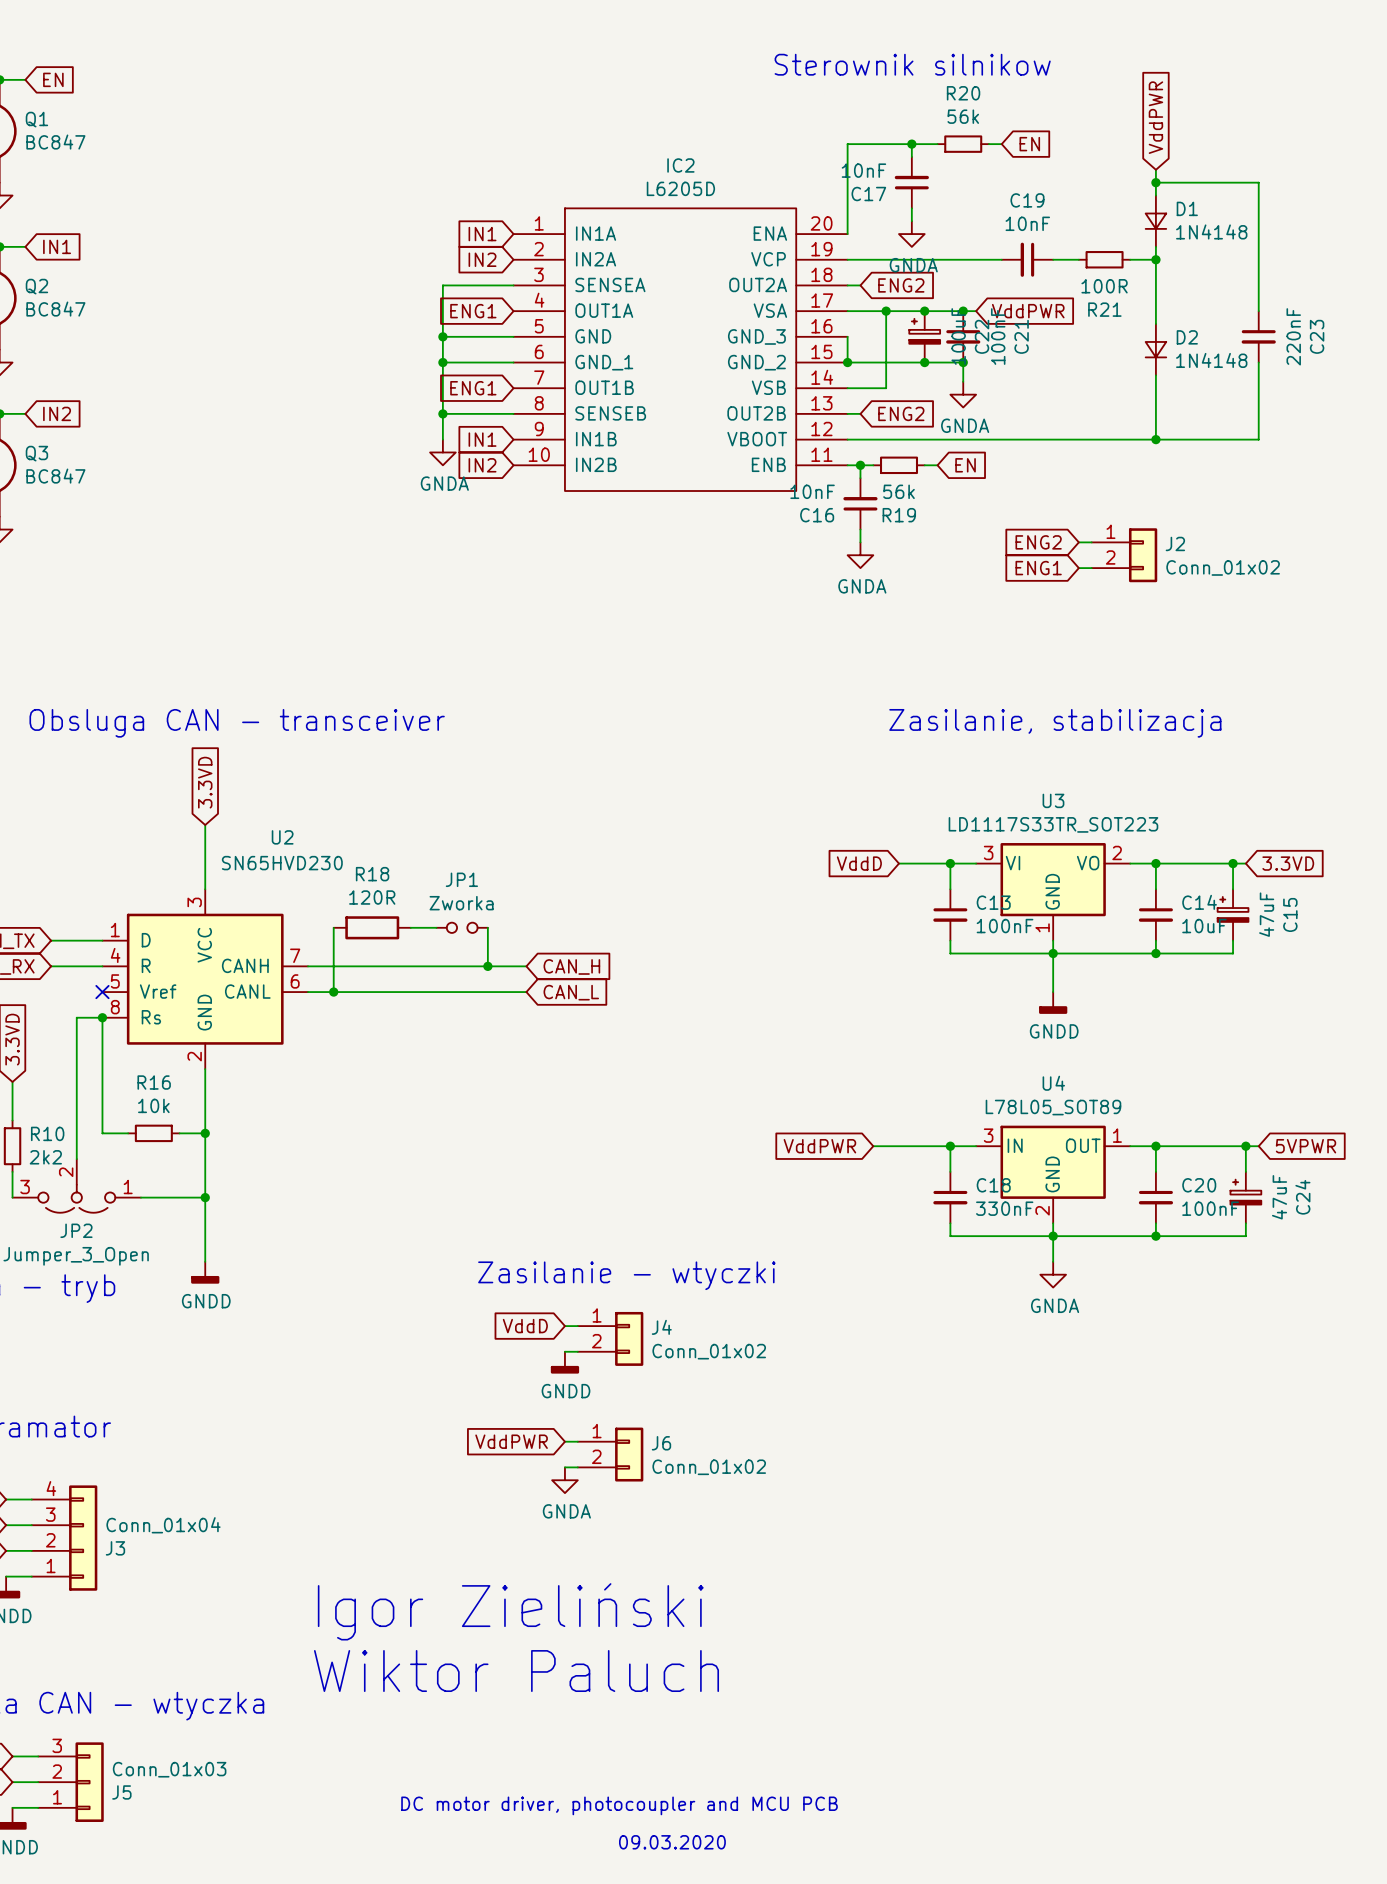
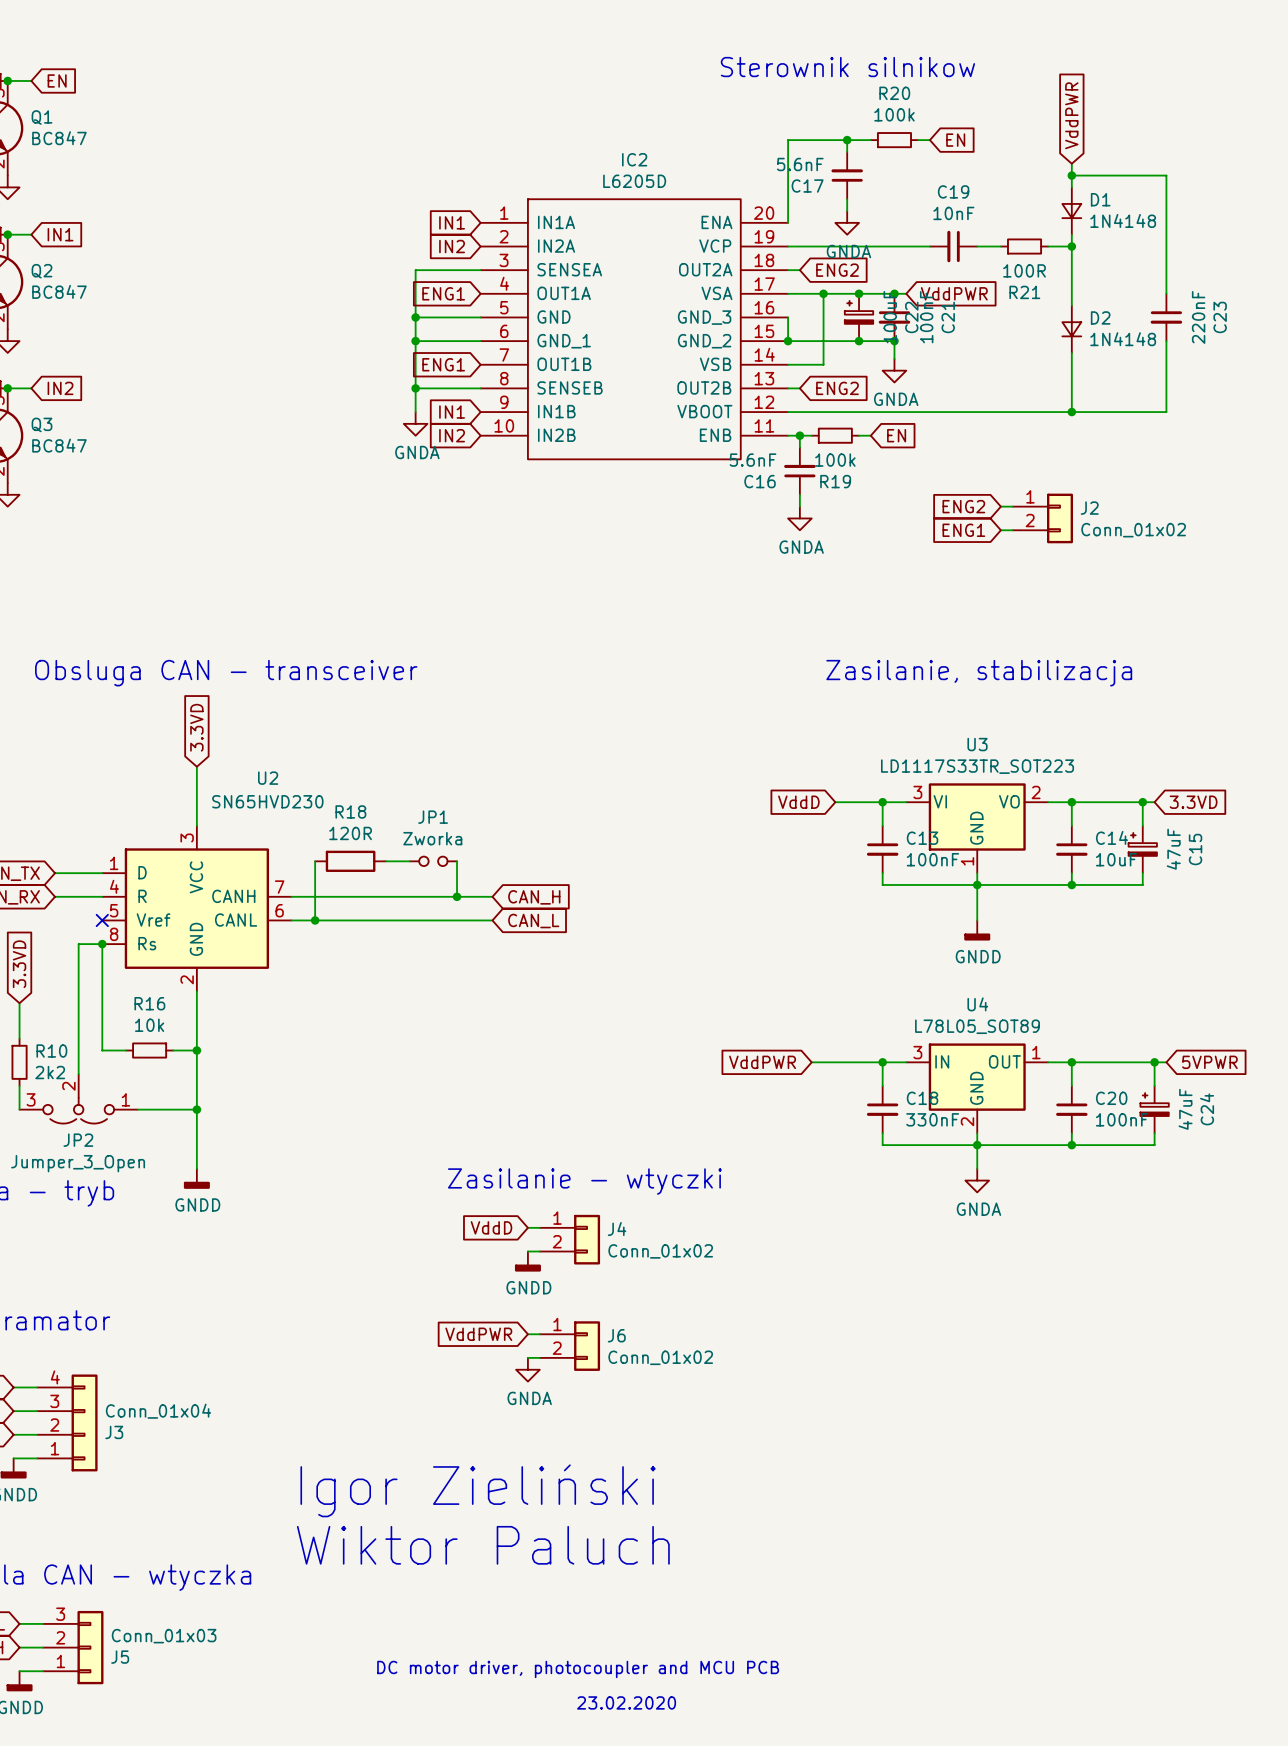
R20 value: 56k (963, 116) -> 100k (894, 114)
C17 value: 10nF (863, 170) -> 5.6nF (800, 164)
C16 value: 10nF (812, 491) -> 5.6nF (752, 460)
R19 value: 56k (899, 491) -> 100k (835, 460)
text: 09.03.2020 (672, 1842) -> 23.02.2020 (626, 1702)

